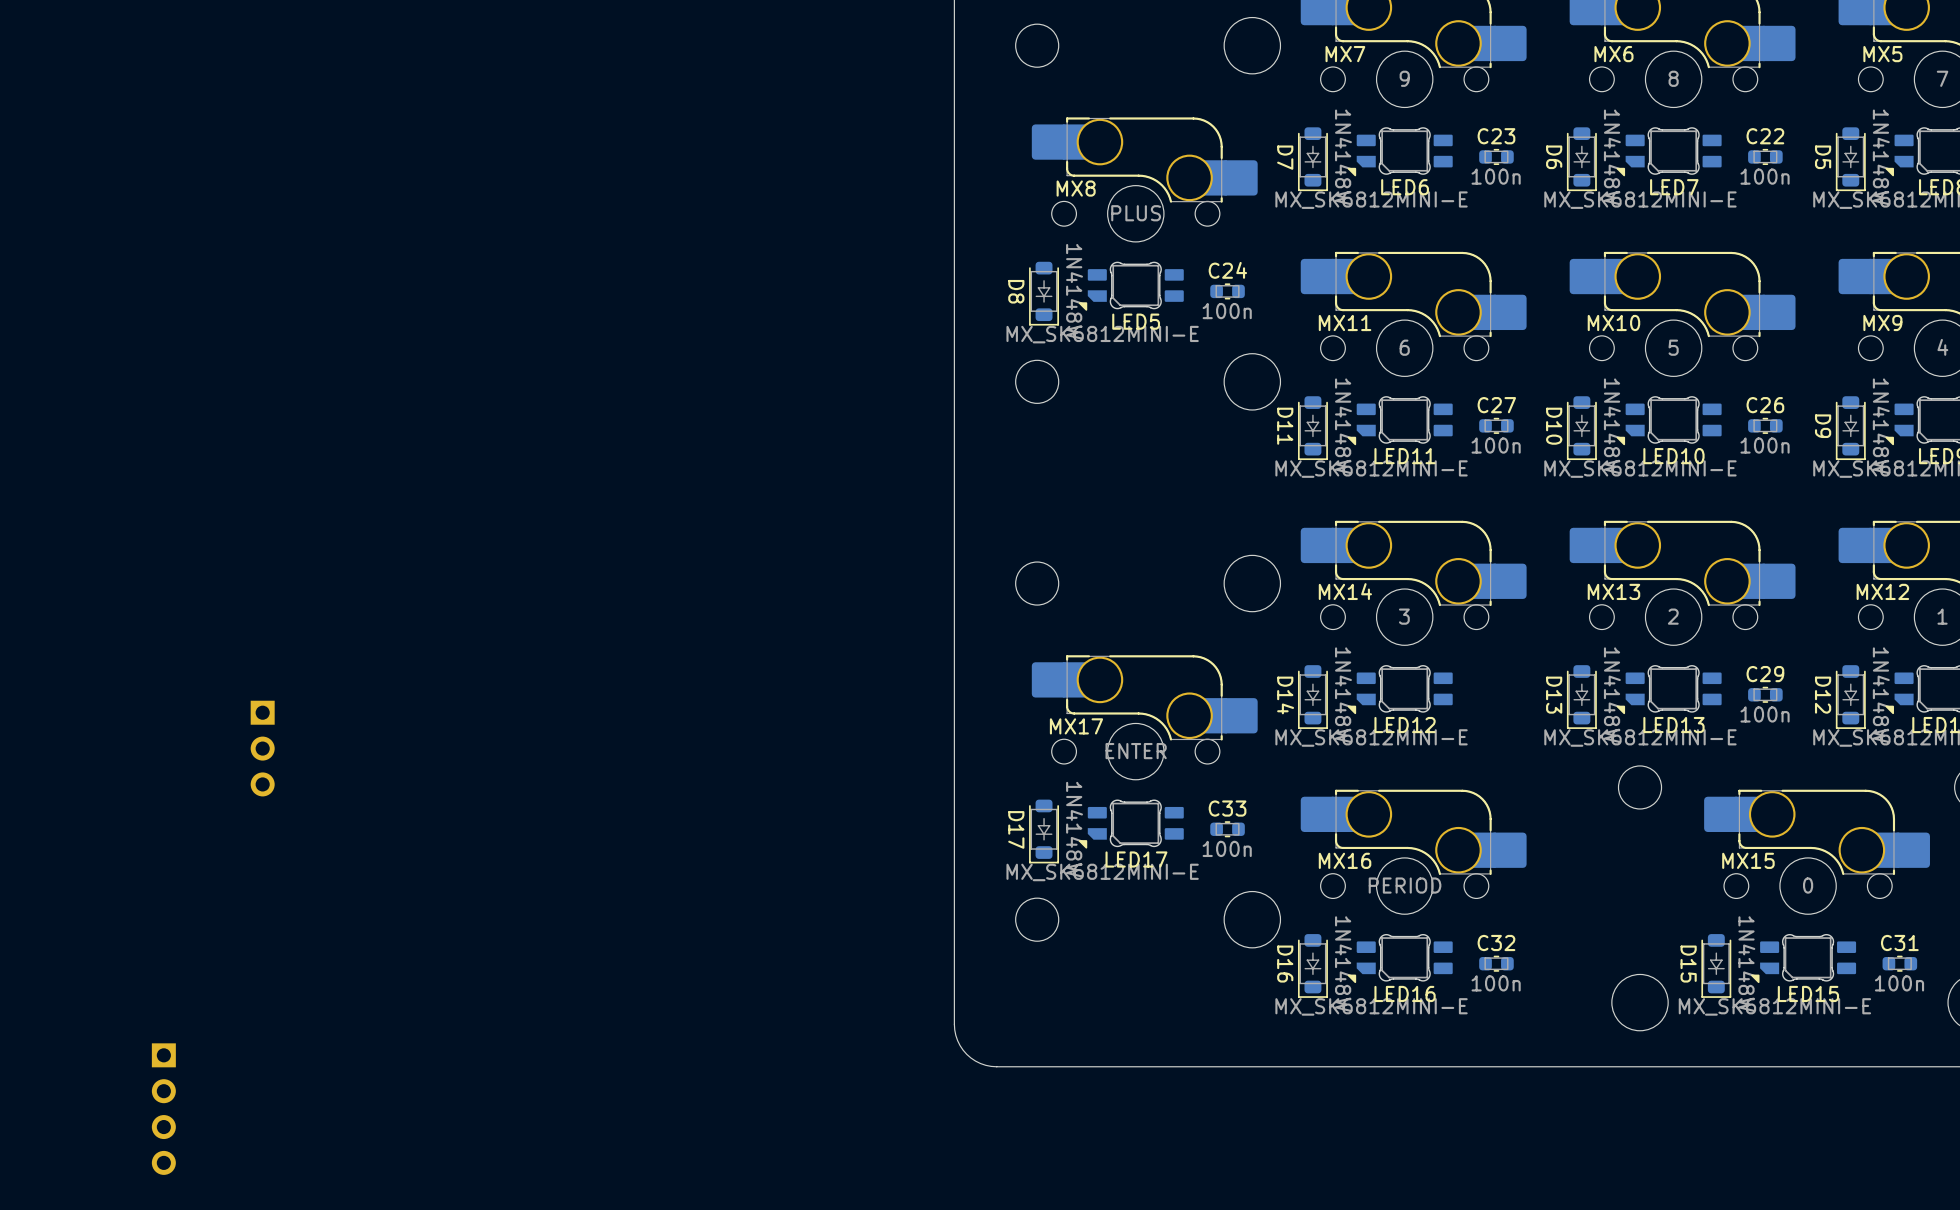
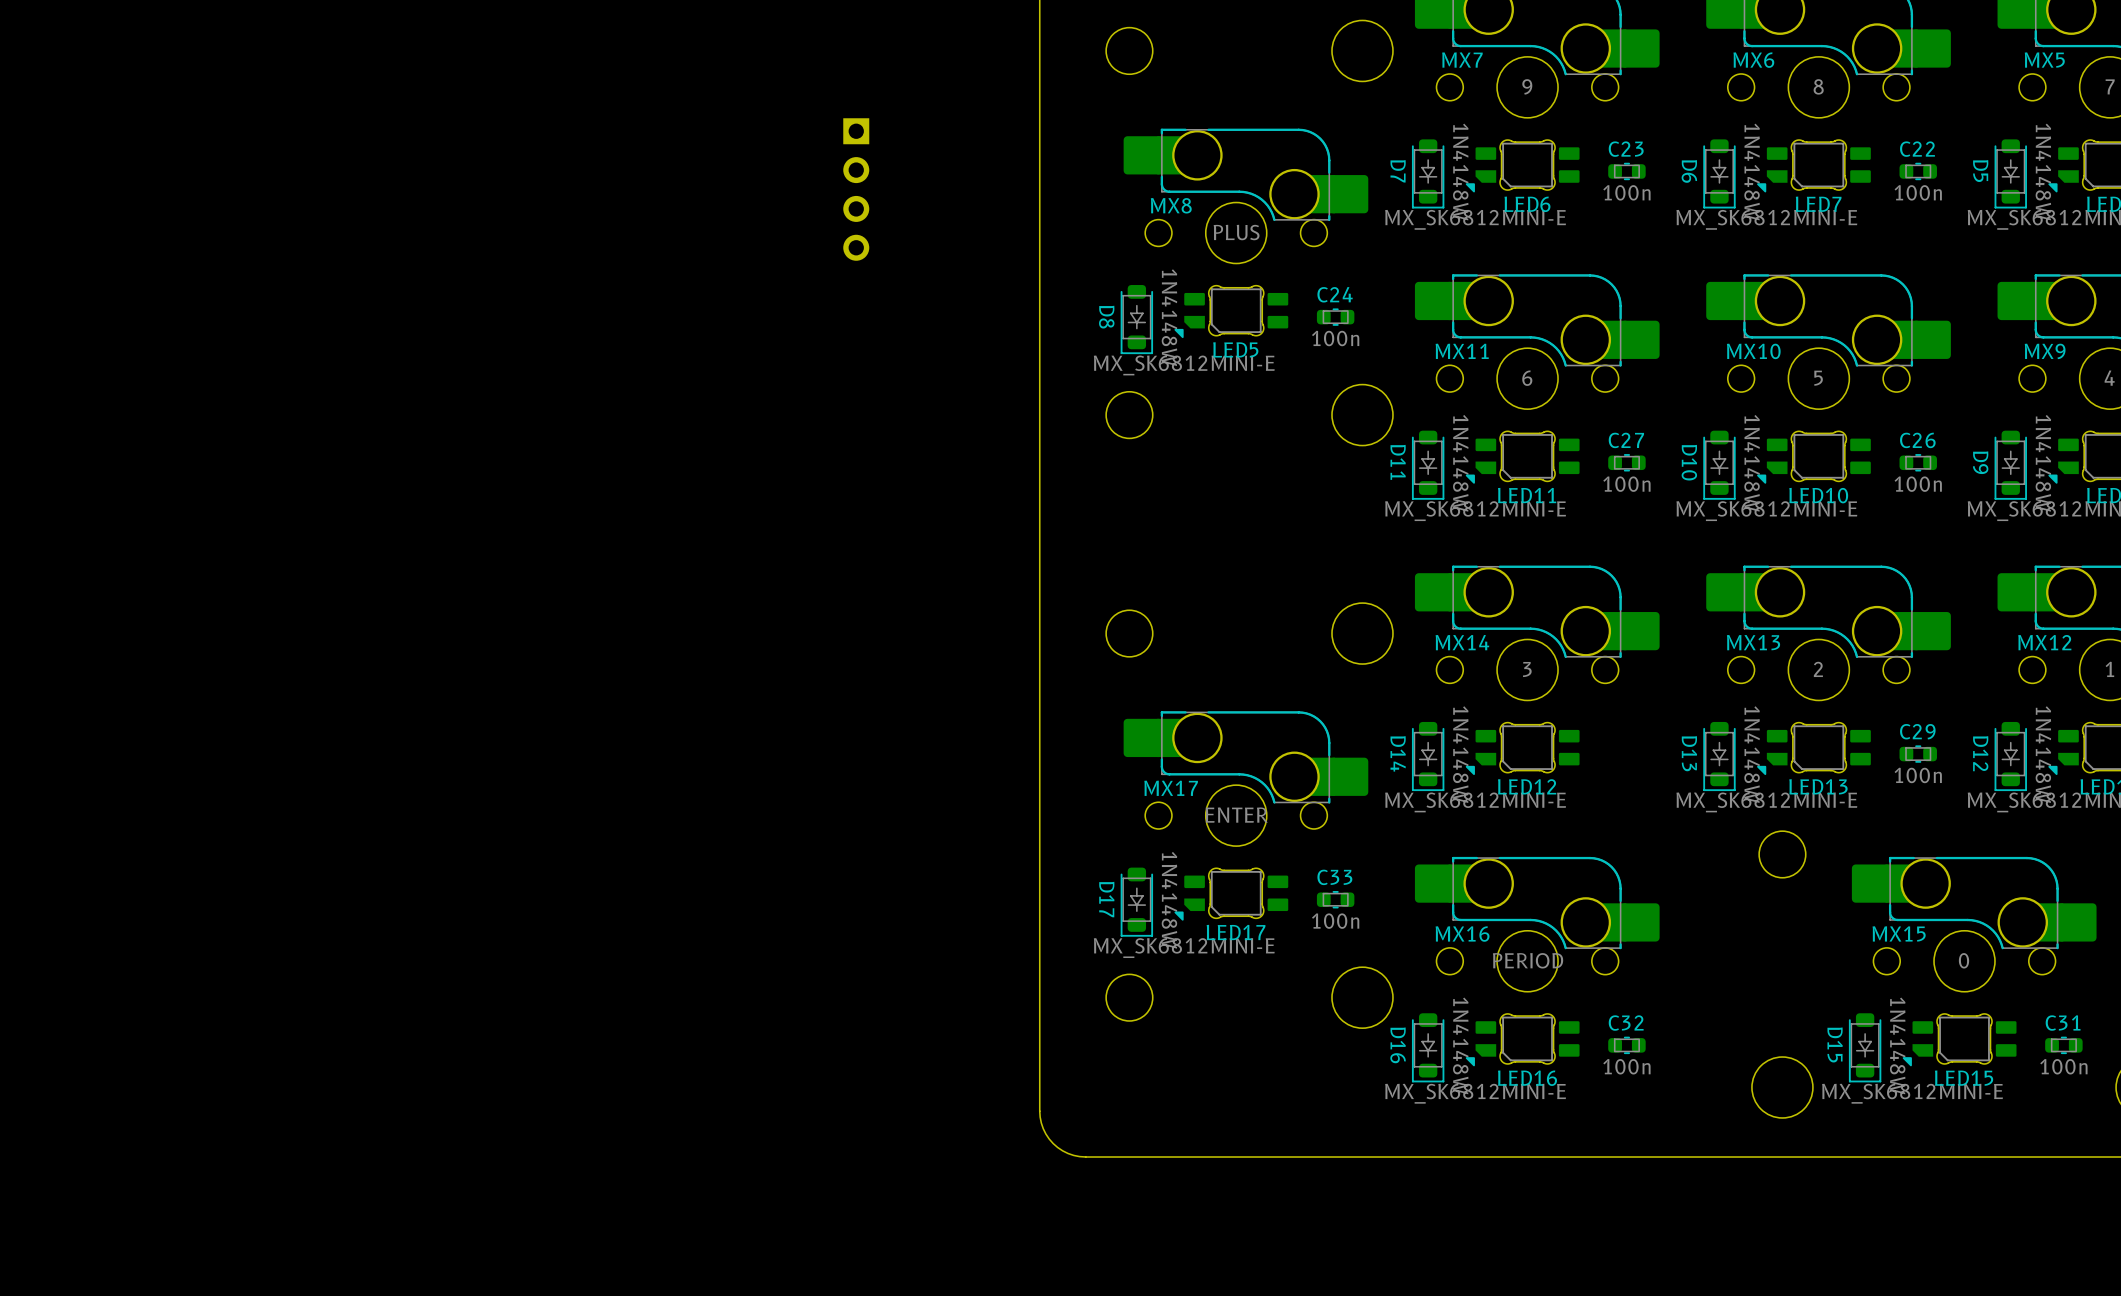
part: none -> (856, 189)
part: (262, 748) -> none
part: (163, 1109) -> none

